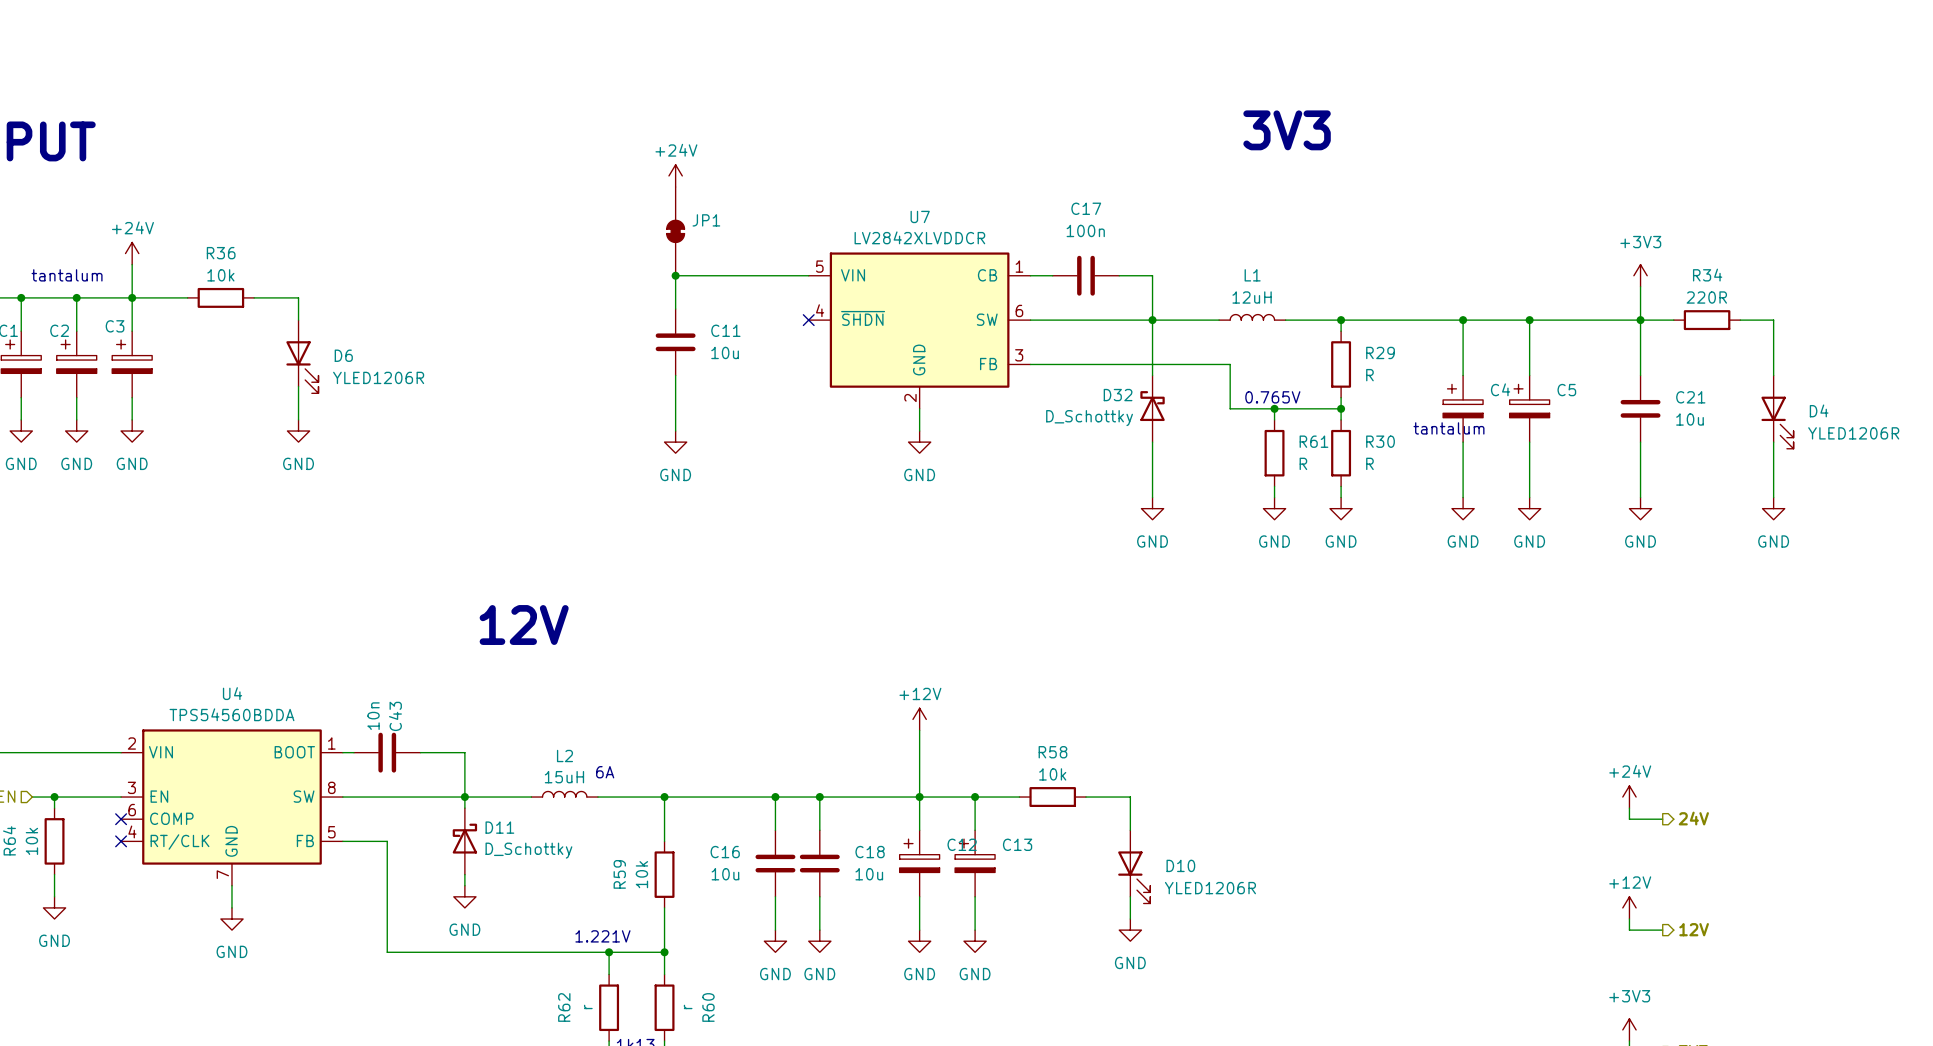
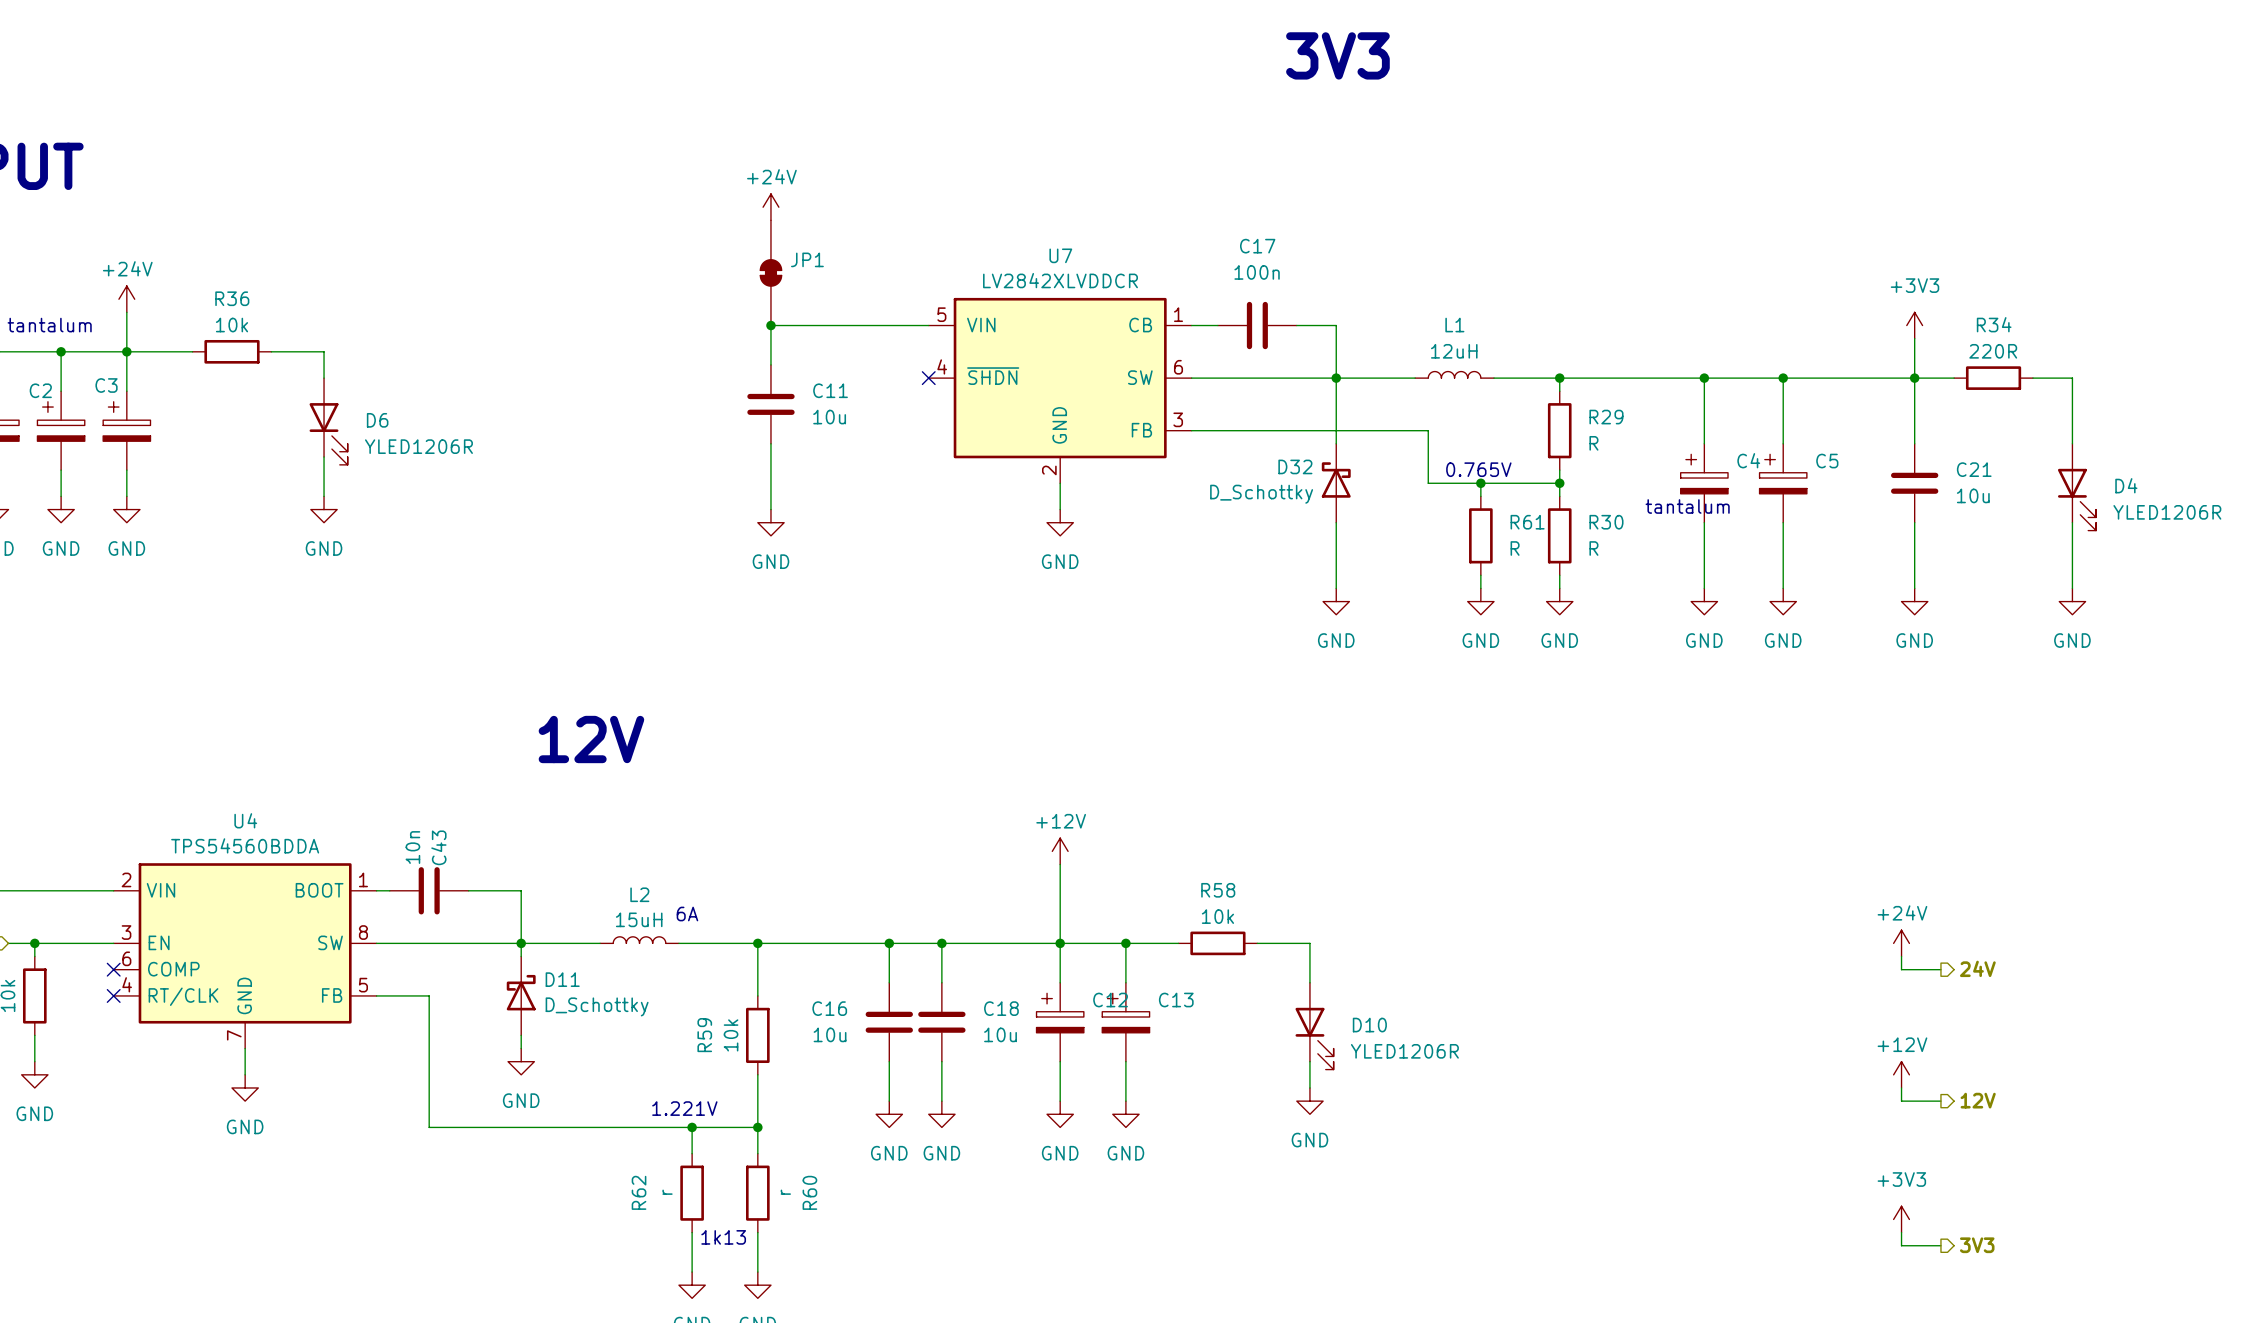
text position: 3V3 (1287, 130) -> 3V3 (1337, 55)

